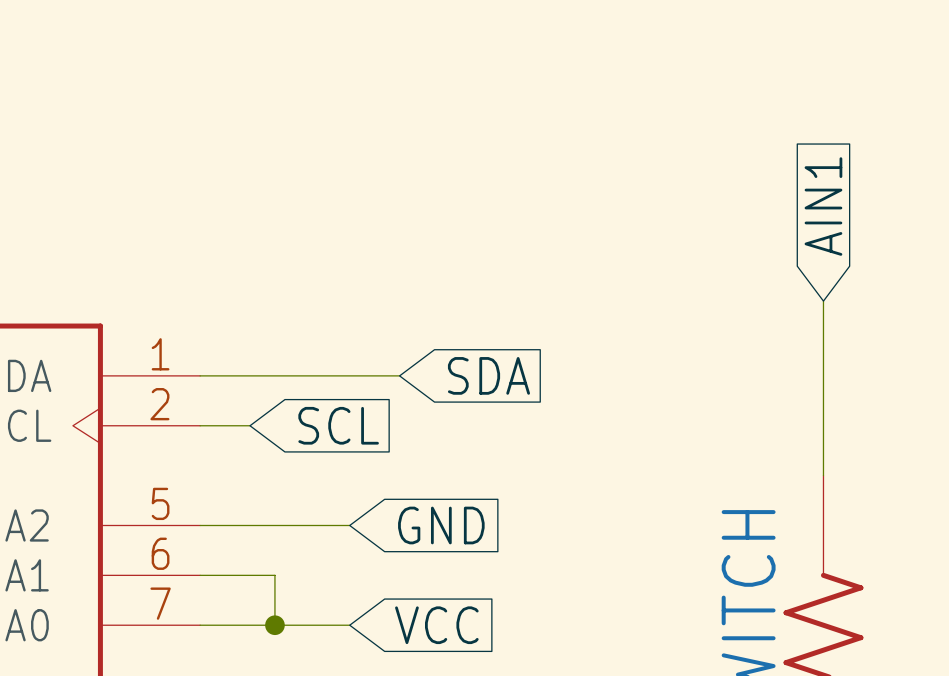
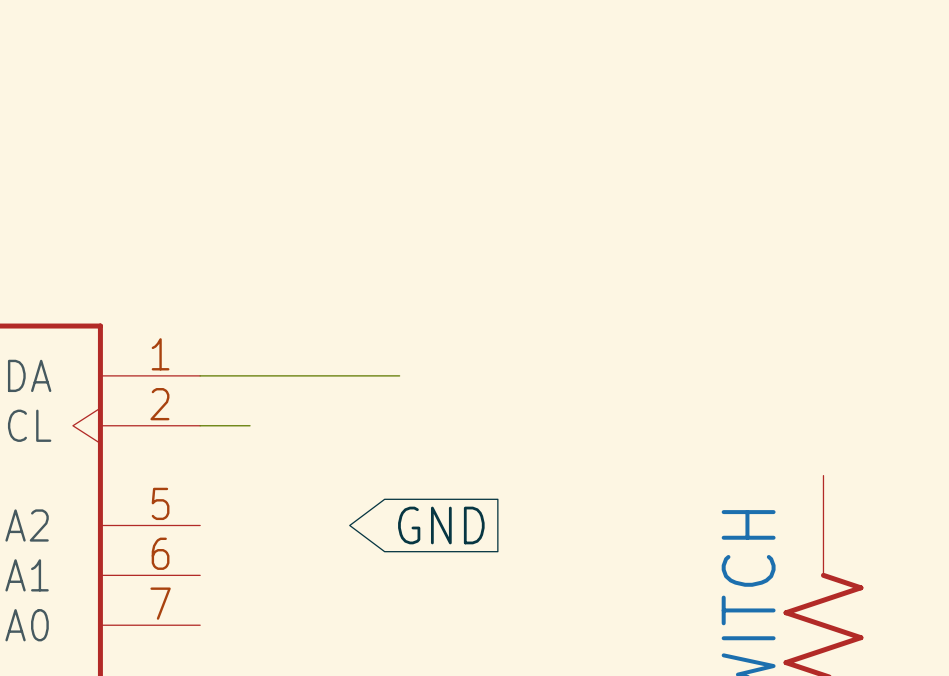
global label: AIN1 (823, 206) -> none
wire: (823, 301) (823, 475) -> none
global label: SDA (488, 375) -> none
global label: SCL (338, 425) -> none
wire: (200, 525) (349, 525) -> none
wire: (200, 575) (274, 575) (274, 625) -> none
wire: (200, 625) (349, 625) -> none
junction: (274, 625) -> none
global label: VCC (436, 625) -> none

